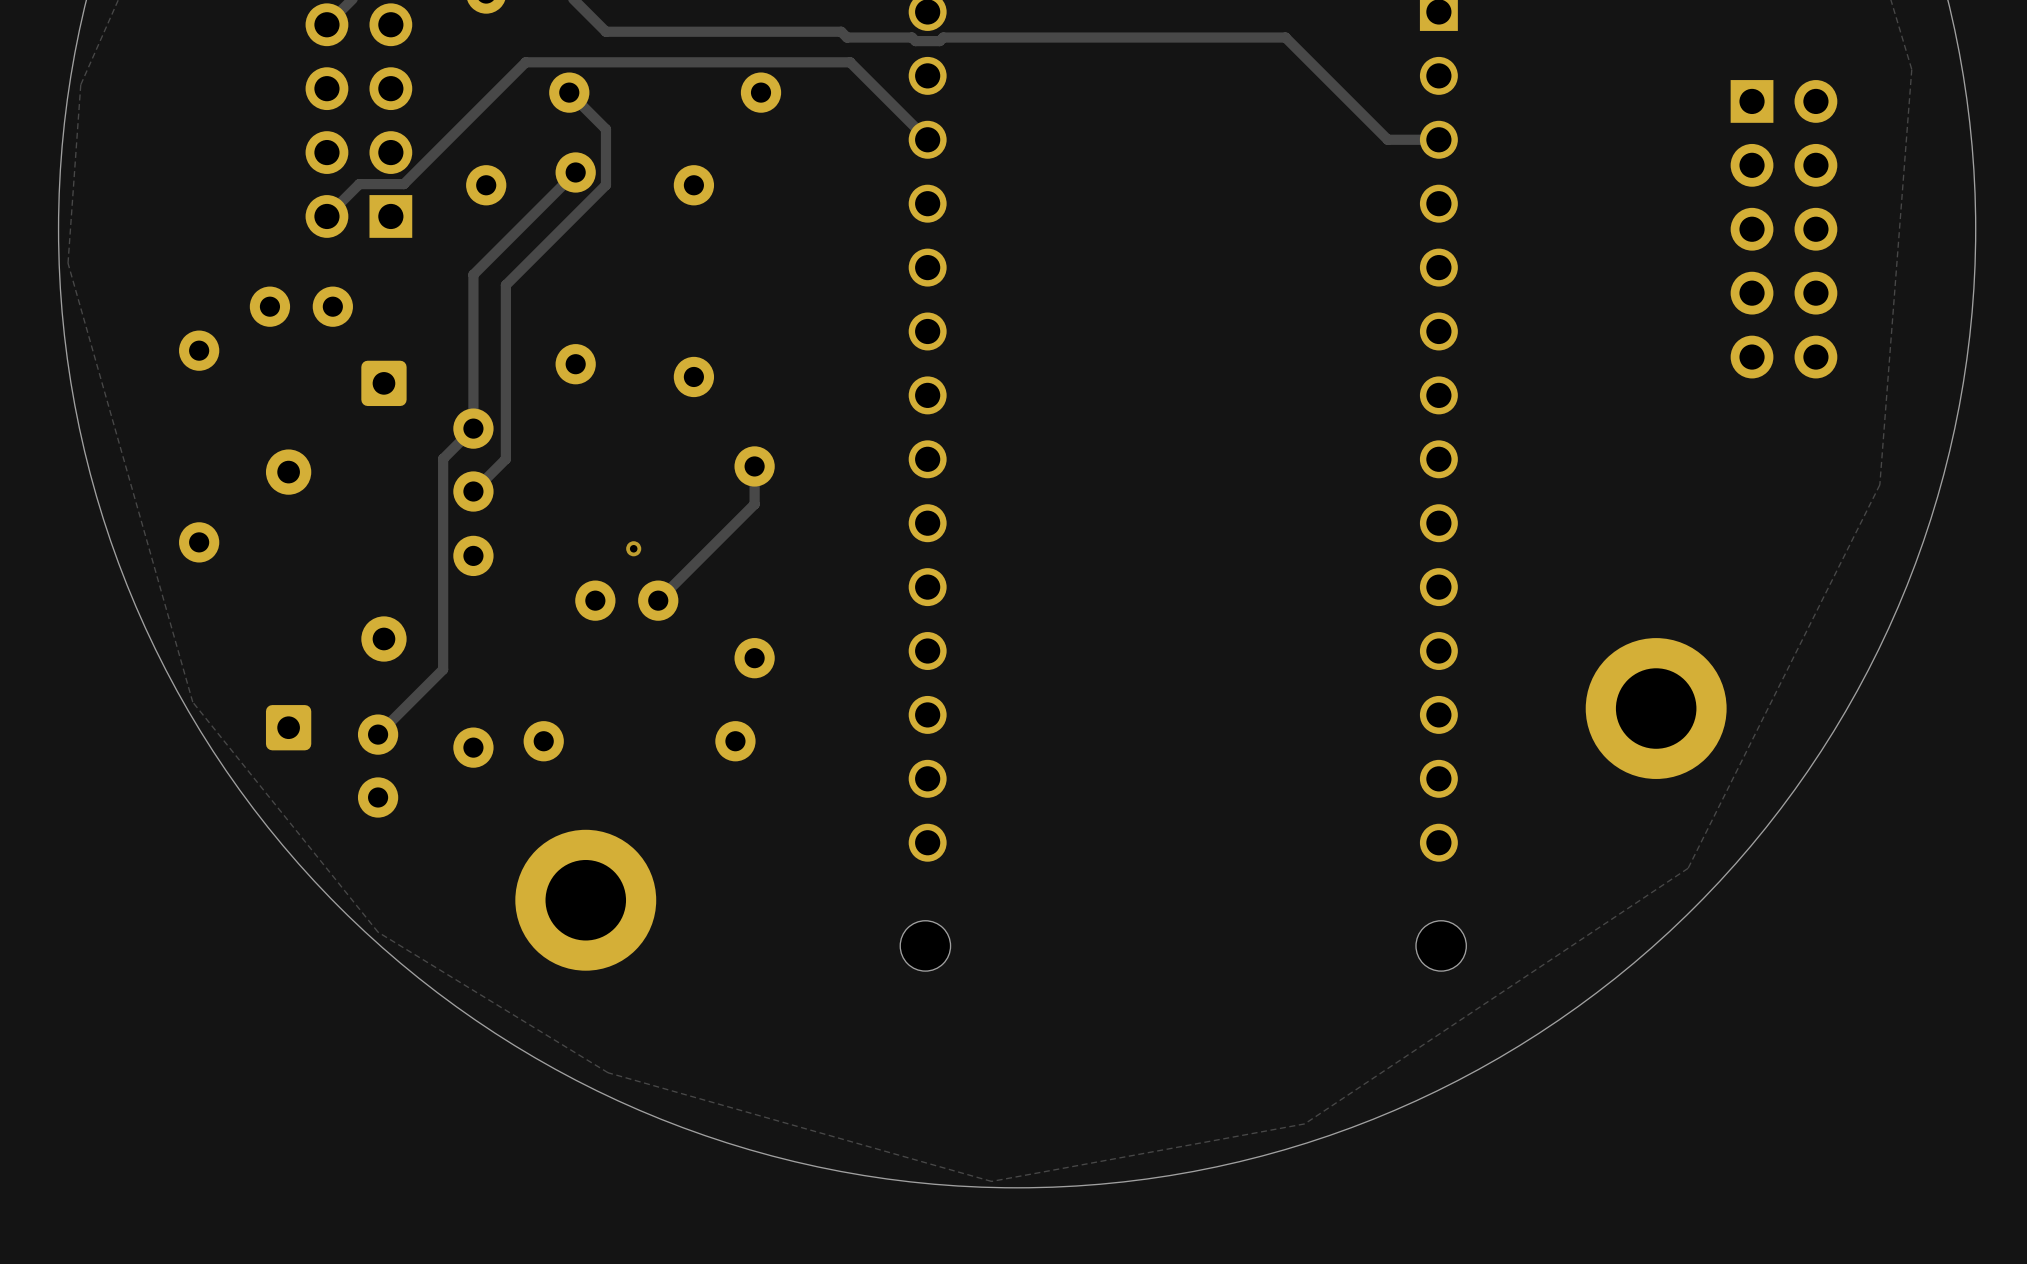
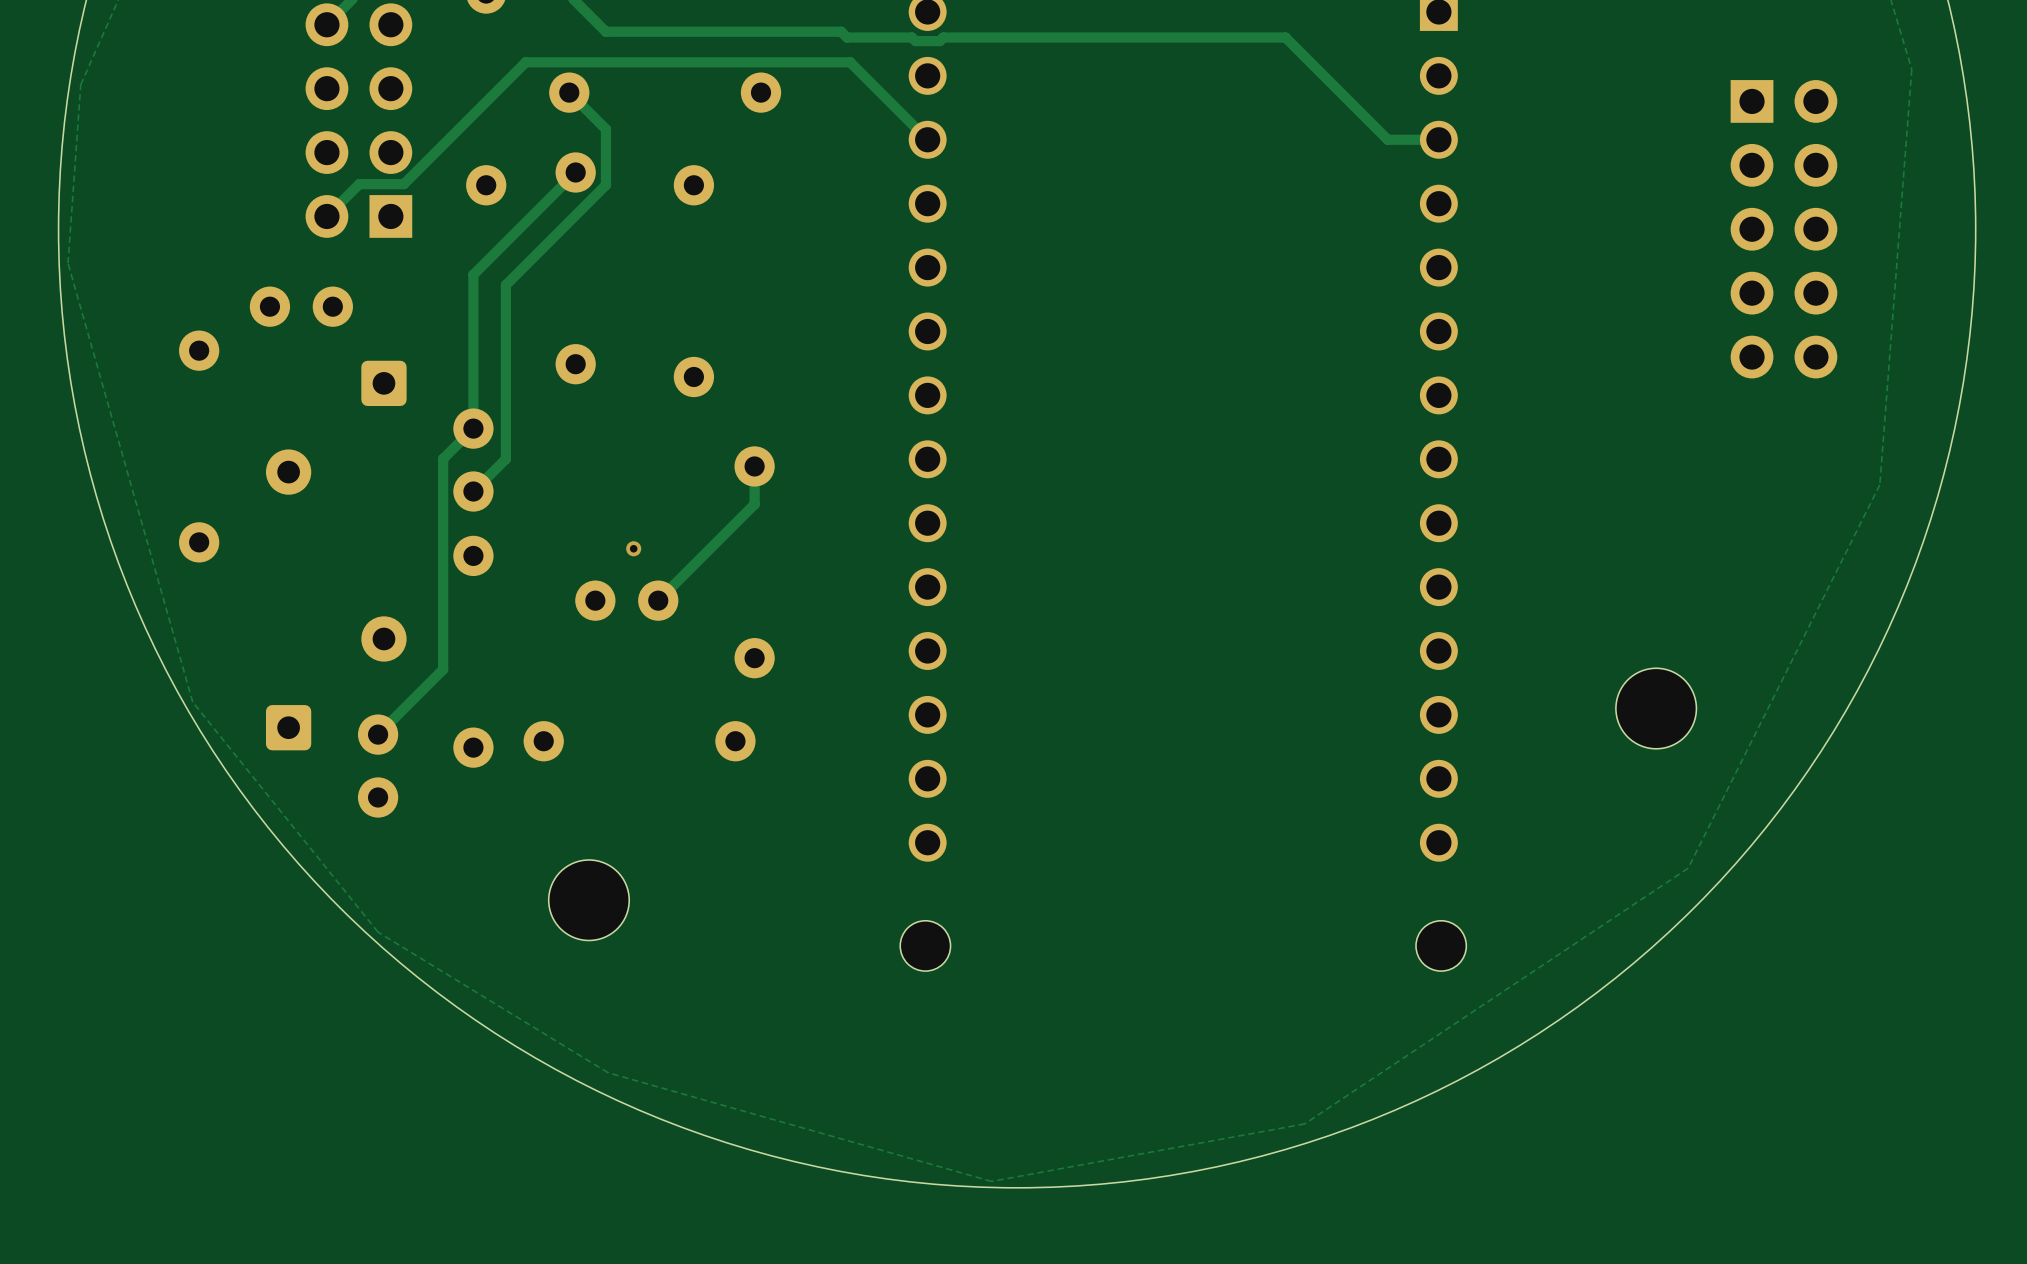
part footprint: [1585, 638, 1727, 779] -> [1615, 668, 1697, 749]
part footprint: [515, 829, 657, 971] -> [548, 859, 630, 941]

